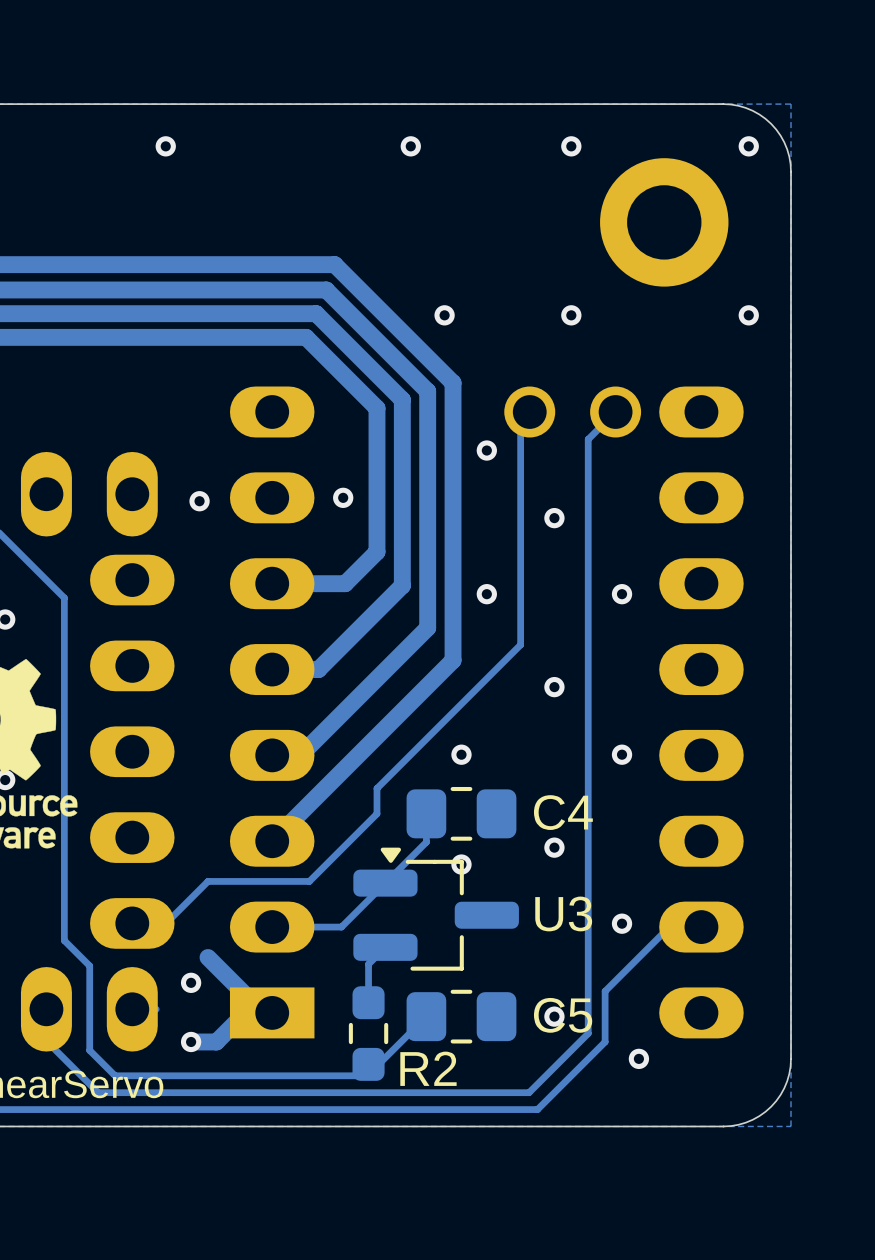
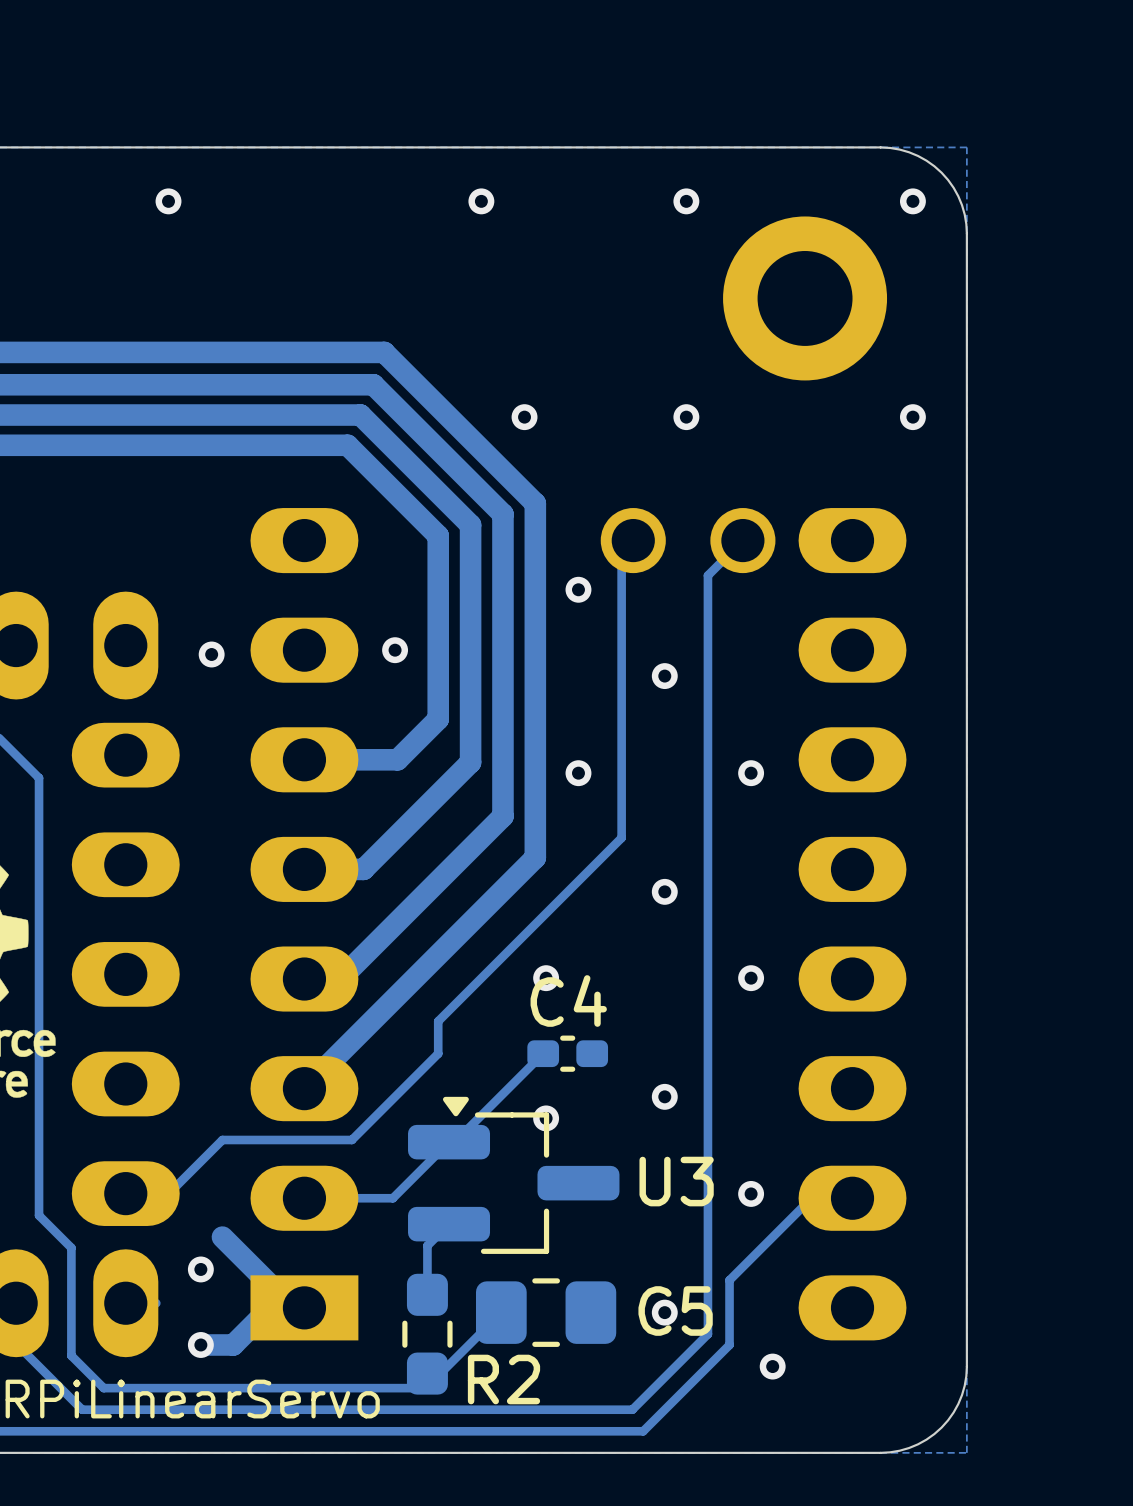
C4 footprint: [406, 786, 517, 841] -> [527, 1035, 609, 1072]
C4 name position: C4 (563, 812) -> C4 (568, 1000)
track: (426, 813) (426, 842) (385, 883) -> (543, 1053) (454, 1142) (449, 1142)

